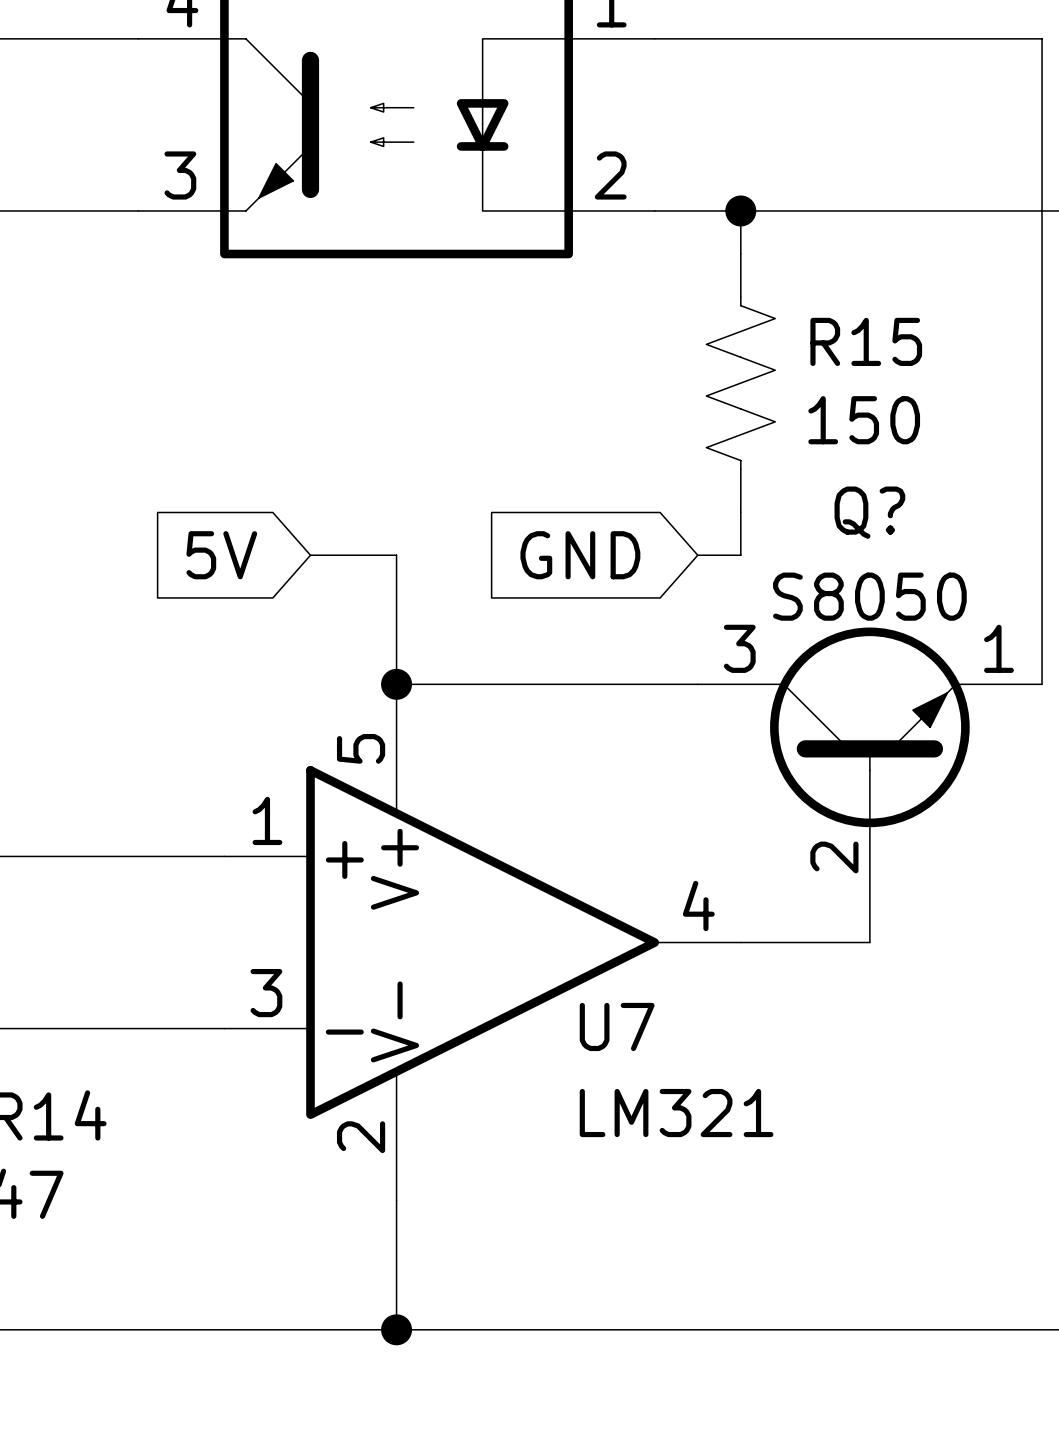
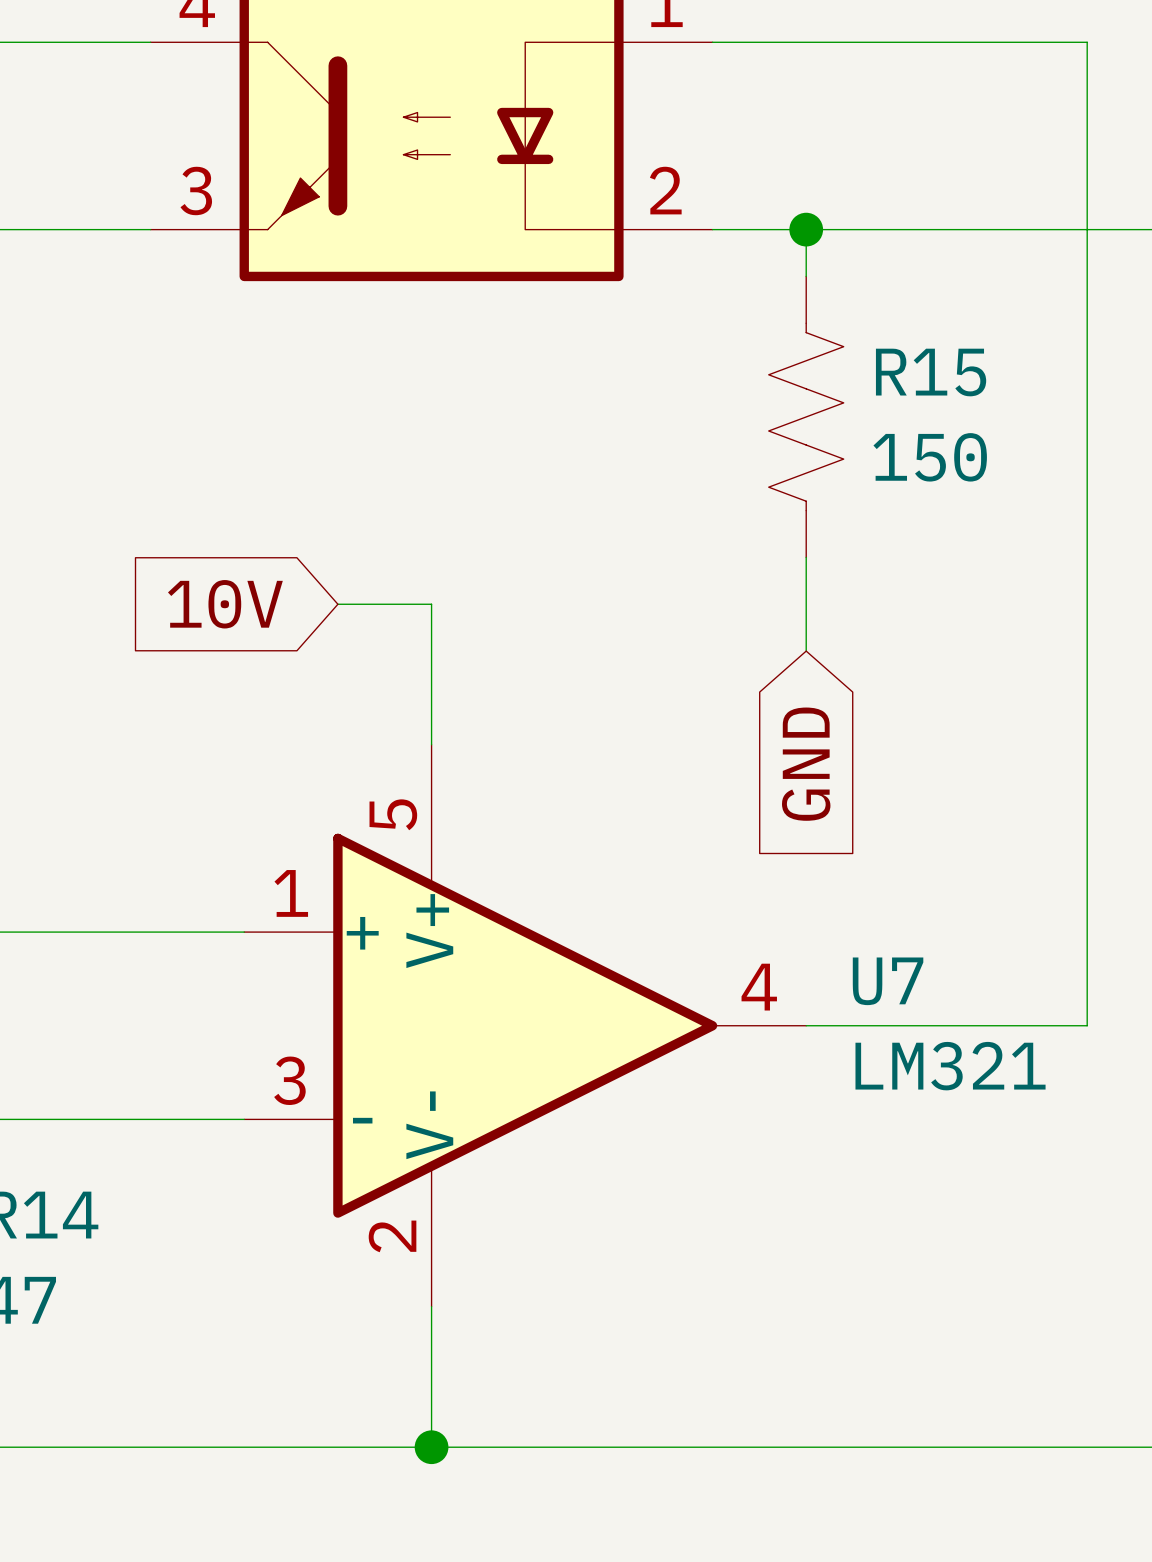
wire: (998, 38) (1042, 38) (1042, 684) -> (1087, 42) (1087, 1025) (946, 1025)
global label: 5V (221, 555) -> 10V (225, 604)
global label rotation: 0° (580, 555) -> 90° counterclockwise (806, 764)
wire: (697, 555) (740, 555) -> (806, 651) (806, 604)
wire: (396, 684) (697, 684) -> none
junction: (396, 684) -> none
Q?: S8050 (869, 785) -> none
U7 name position: U7 (617, 1026) -> U7 (888, 981)
U7 value position: LM321 (676, 1113) -> LM321 (950, 1066)

